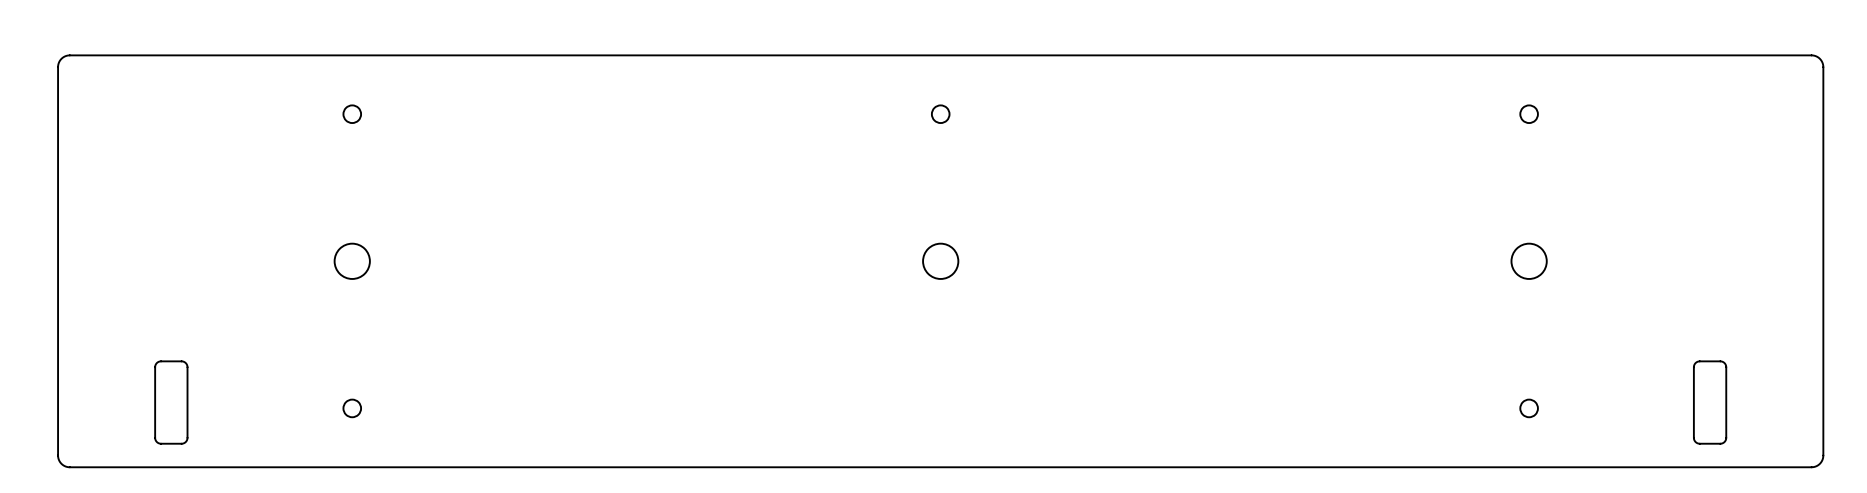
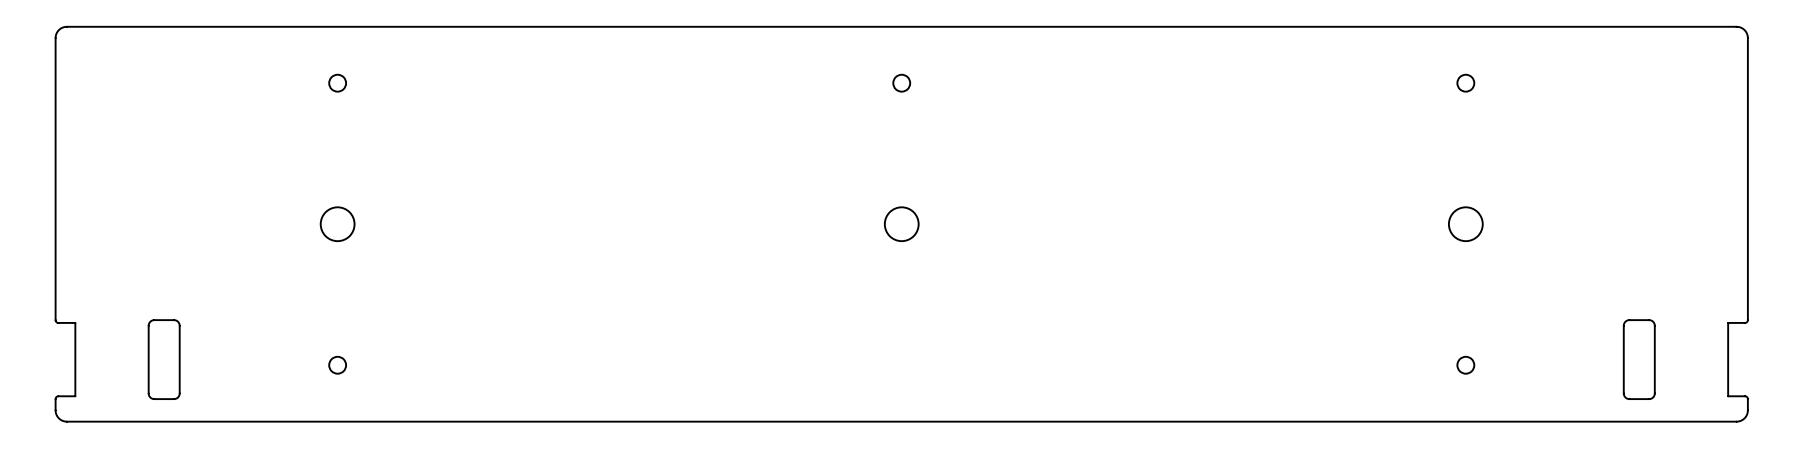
board edge: (58, 361) (58, 443) -> (55, 320) (58, 322) (75, 322) (75, 396) (58, 396) (55, 399)
board edge: (1823, 361) (1823, 443) -> (1747, 320) (1745, 322) (1728, 322) (1728, 396) (1745, 396) (1747, 399)

